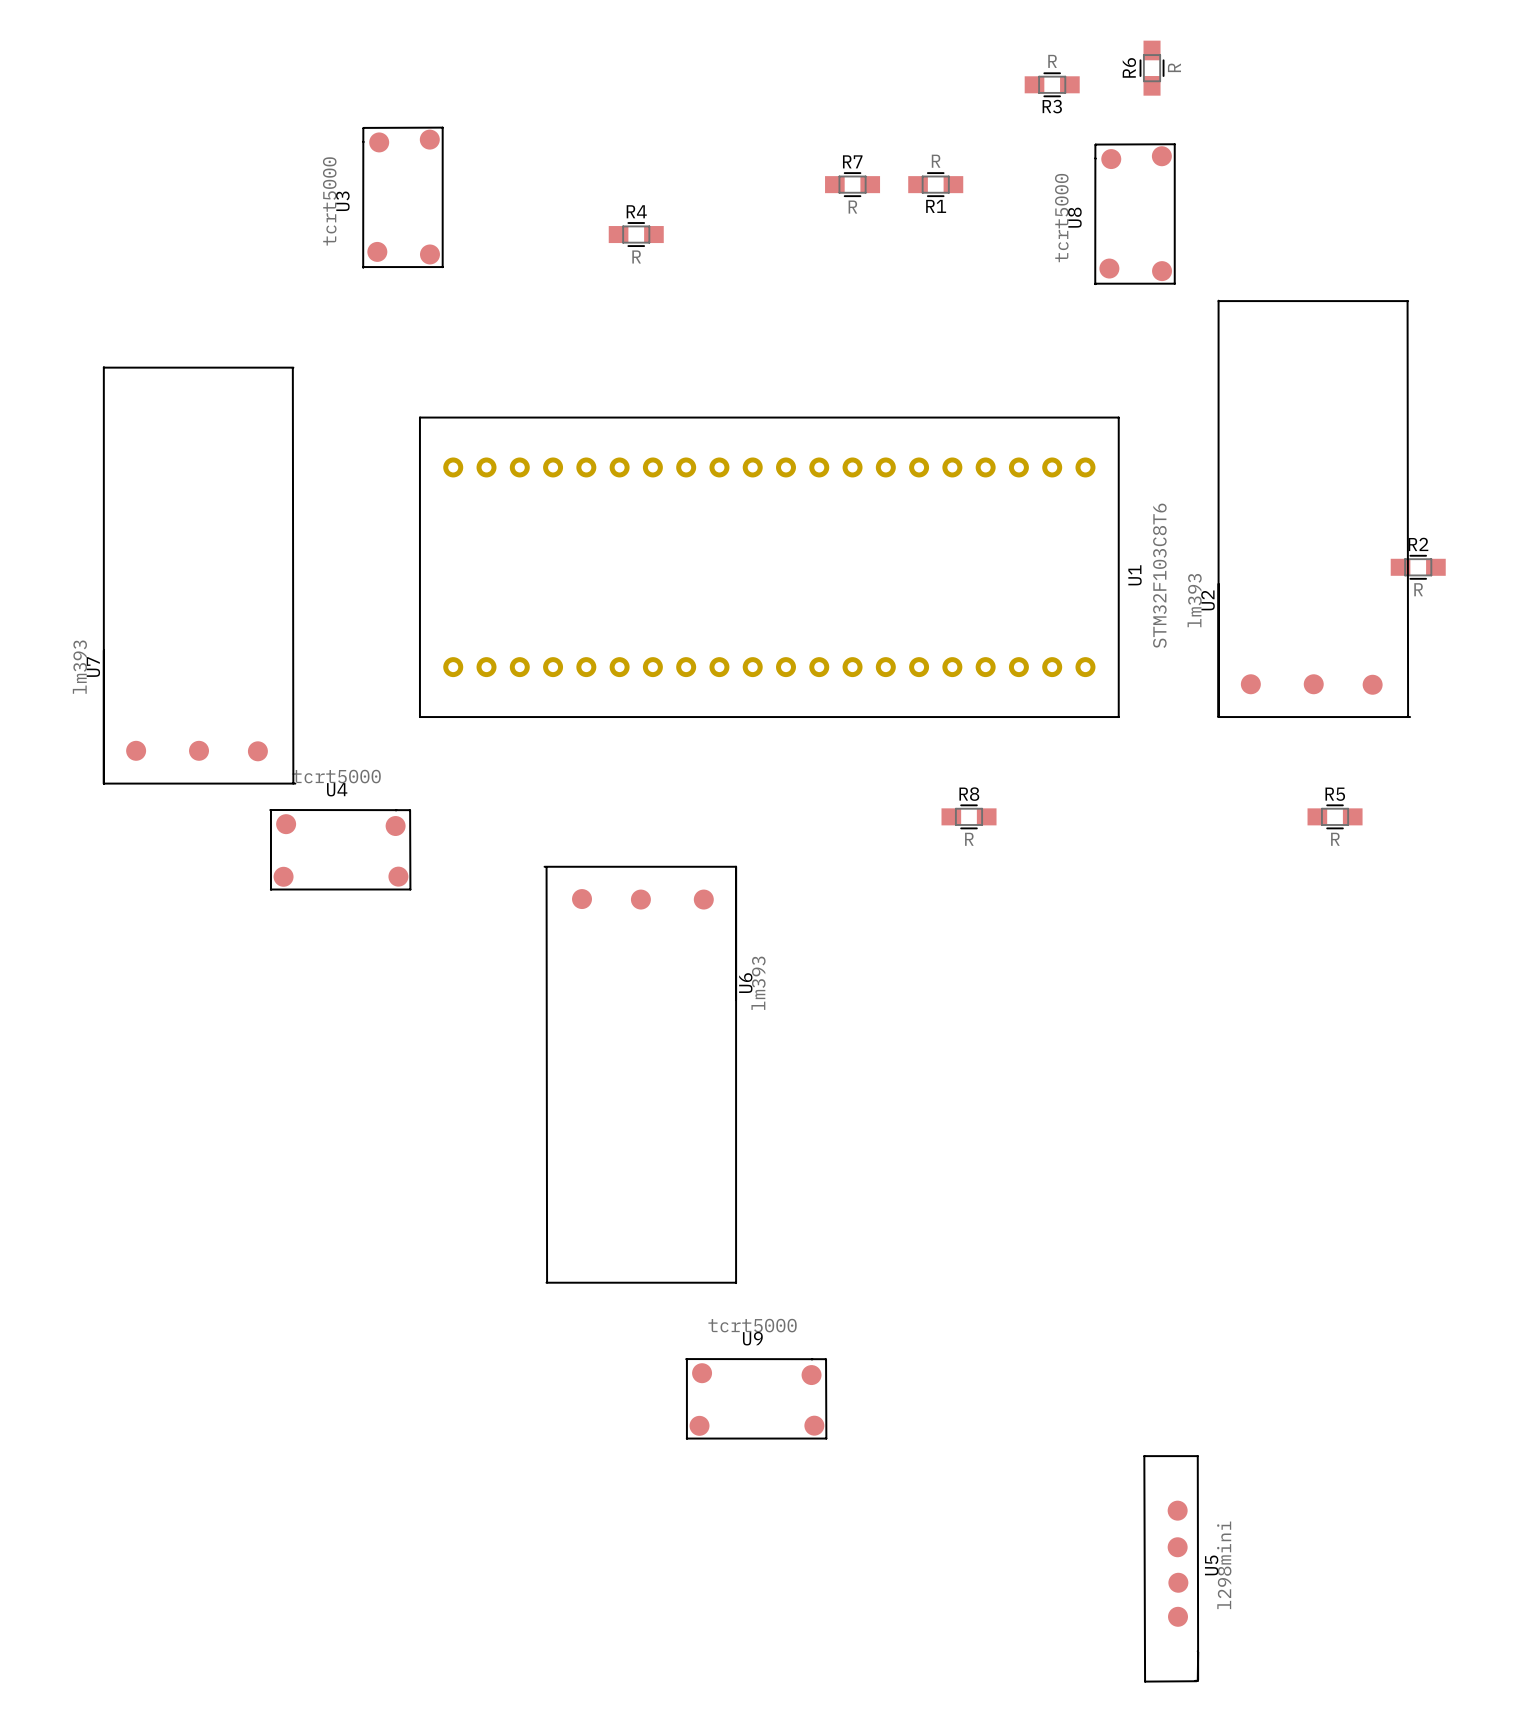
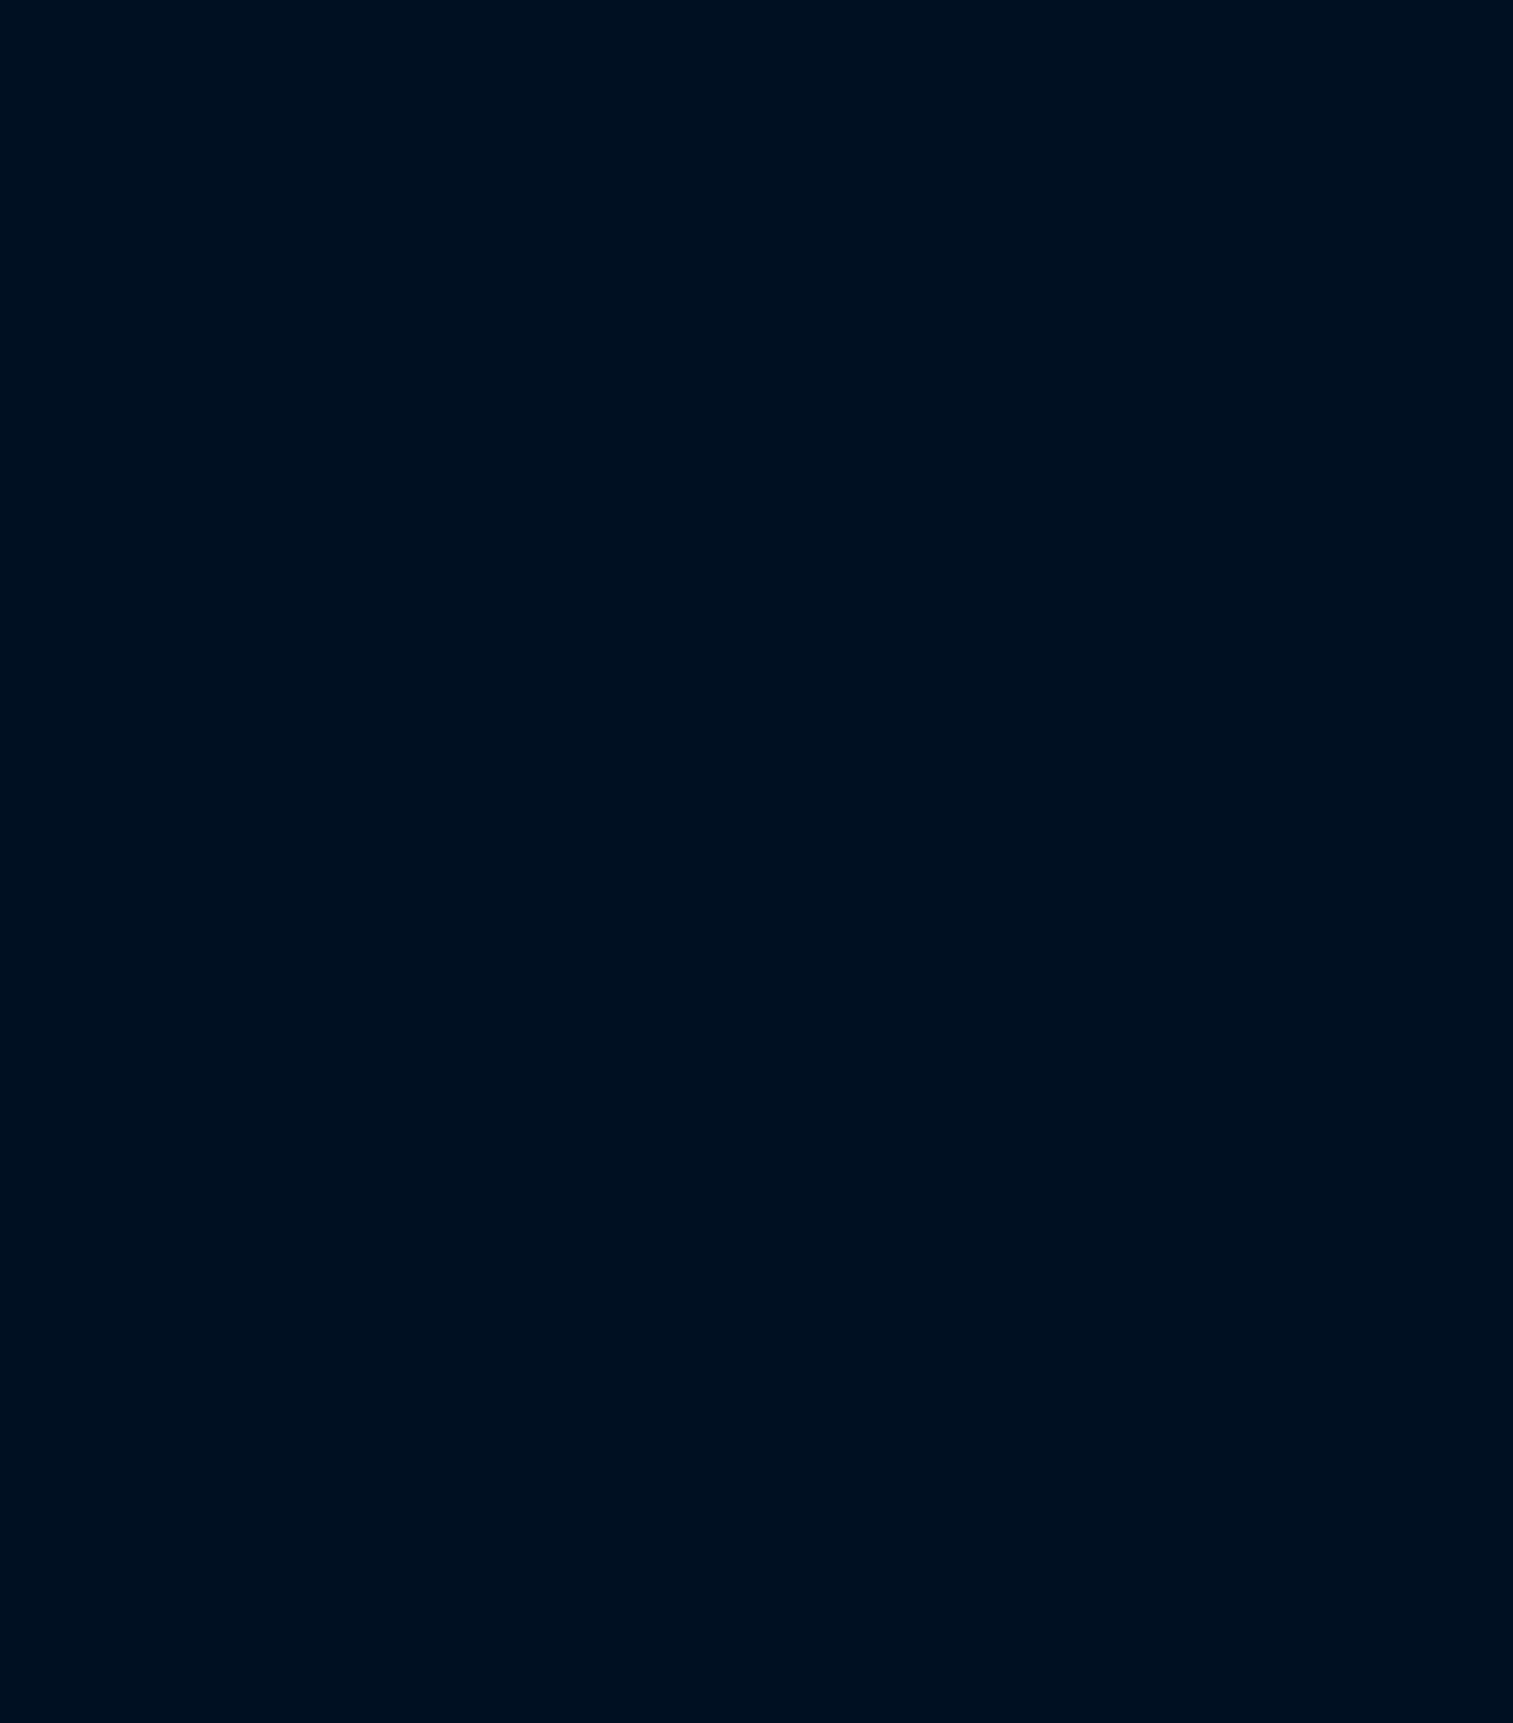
R6: R (1152, 68) -> none
R3: R (1052, 84) -> none
R7: R (852, 184) -> none
R1: R (935, 184) -> none
U3: tcrt5000 (403, 197) -> none
U8: tcrt5000 (1135, 214) -> none
R4: R (636, 234) -> none
U2: lm393 (1314, 508) -> none
U1: STM32F103C8T6 (769, 567) -> none
R2: R (1418, 567) -> none
U7: lm393 (199, 575) -> none
R8: R (969, 816) -> none
R5: R (1335, 816) -> none
U4: tcrt5000 (340, 849) -> none
U6: lm393 (640, 1074) -> none
U9: tcrt5000 (756, 1398) -> none
U5: l298mini (1171, 1568) -> none

